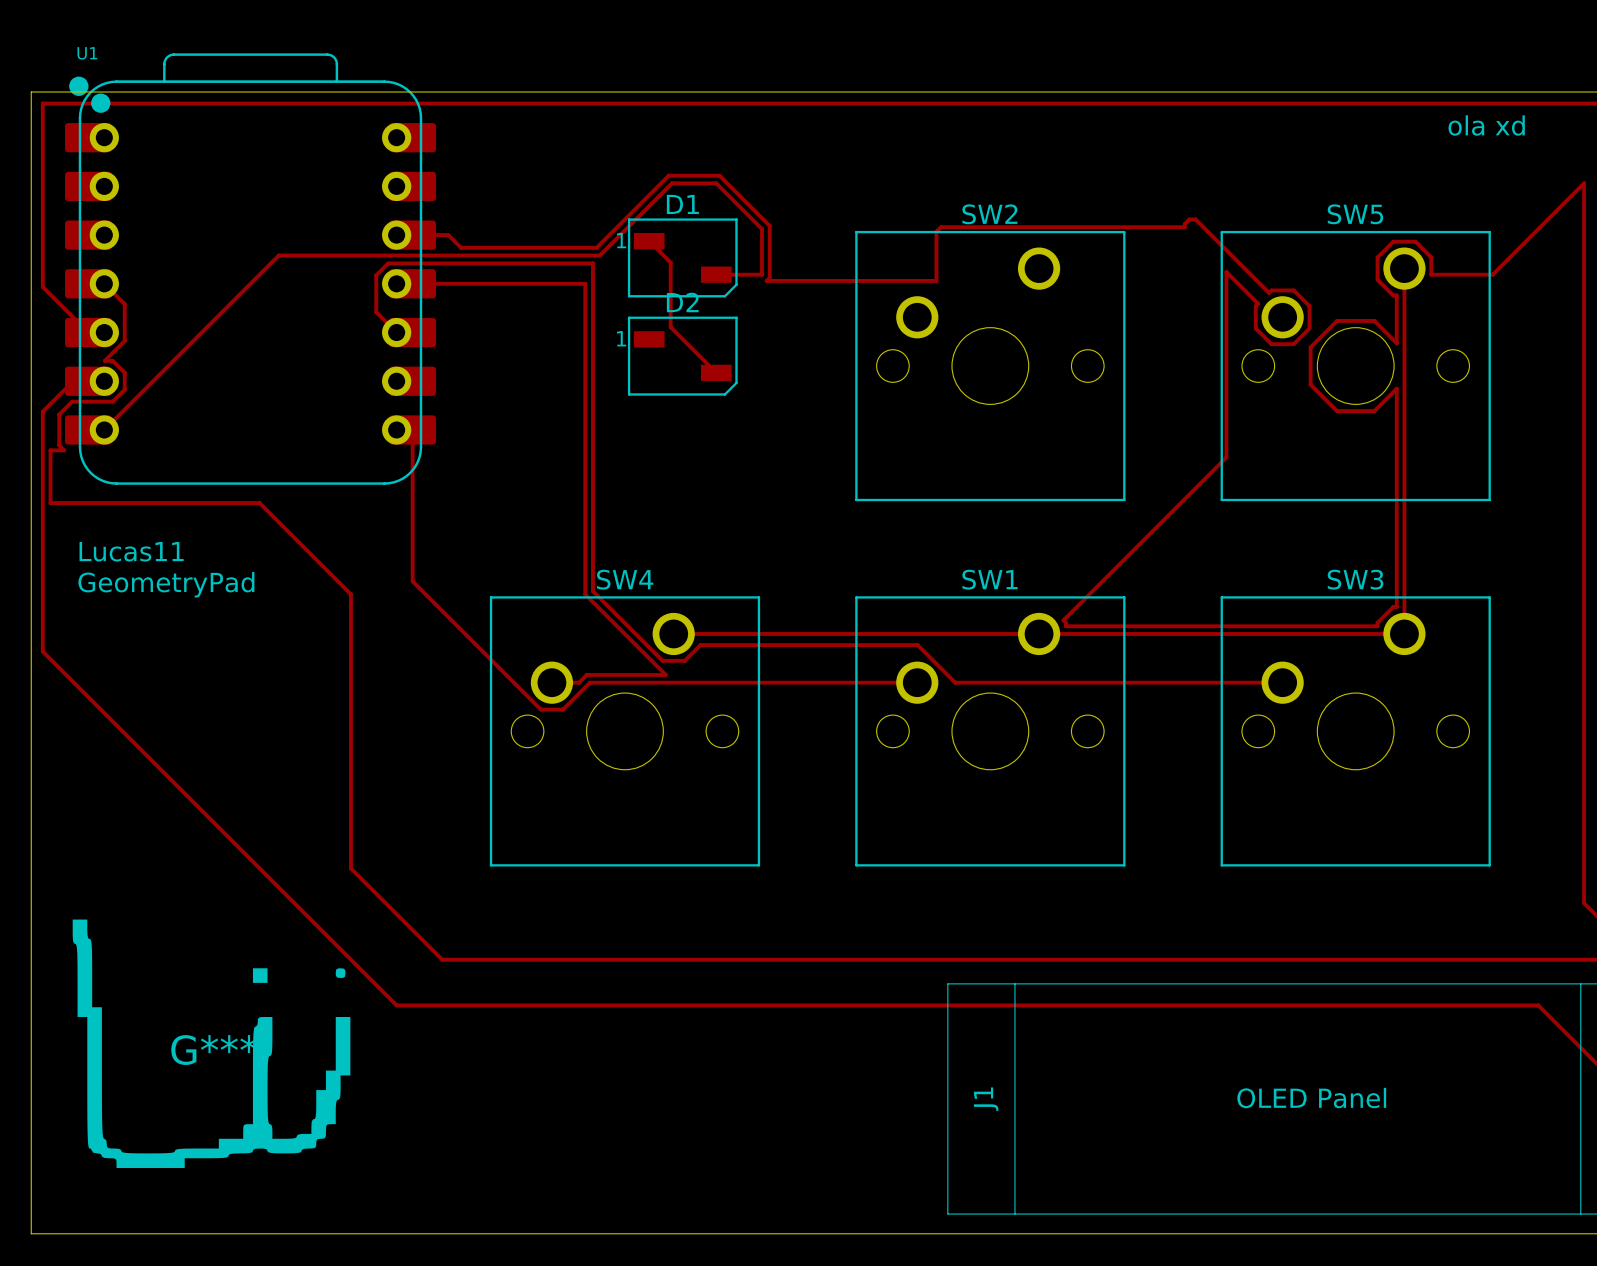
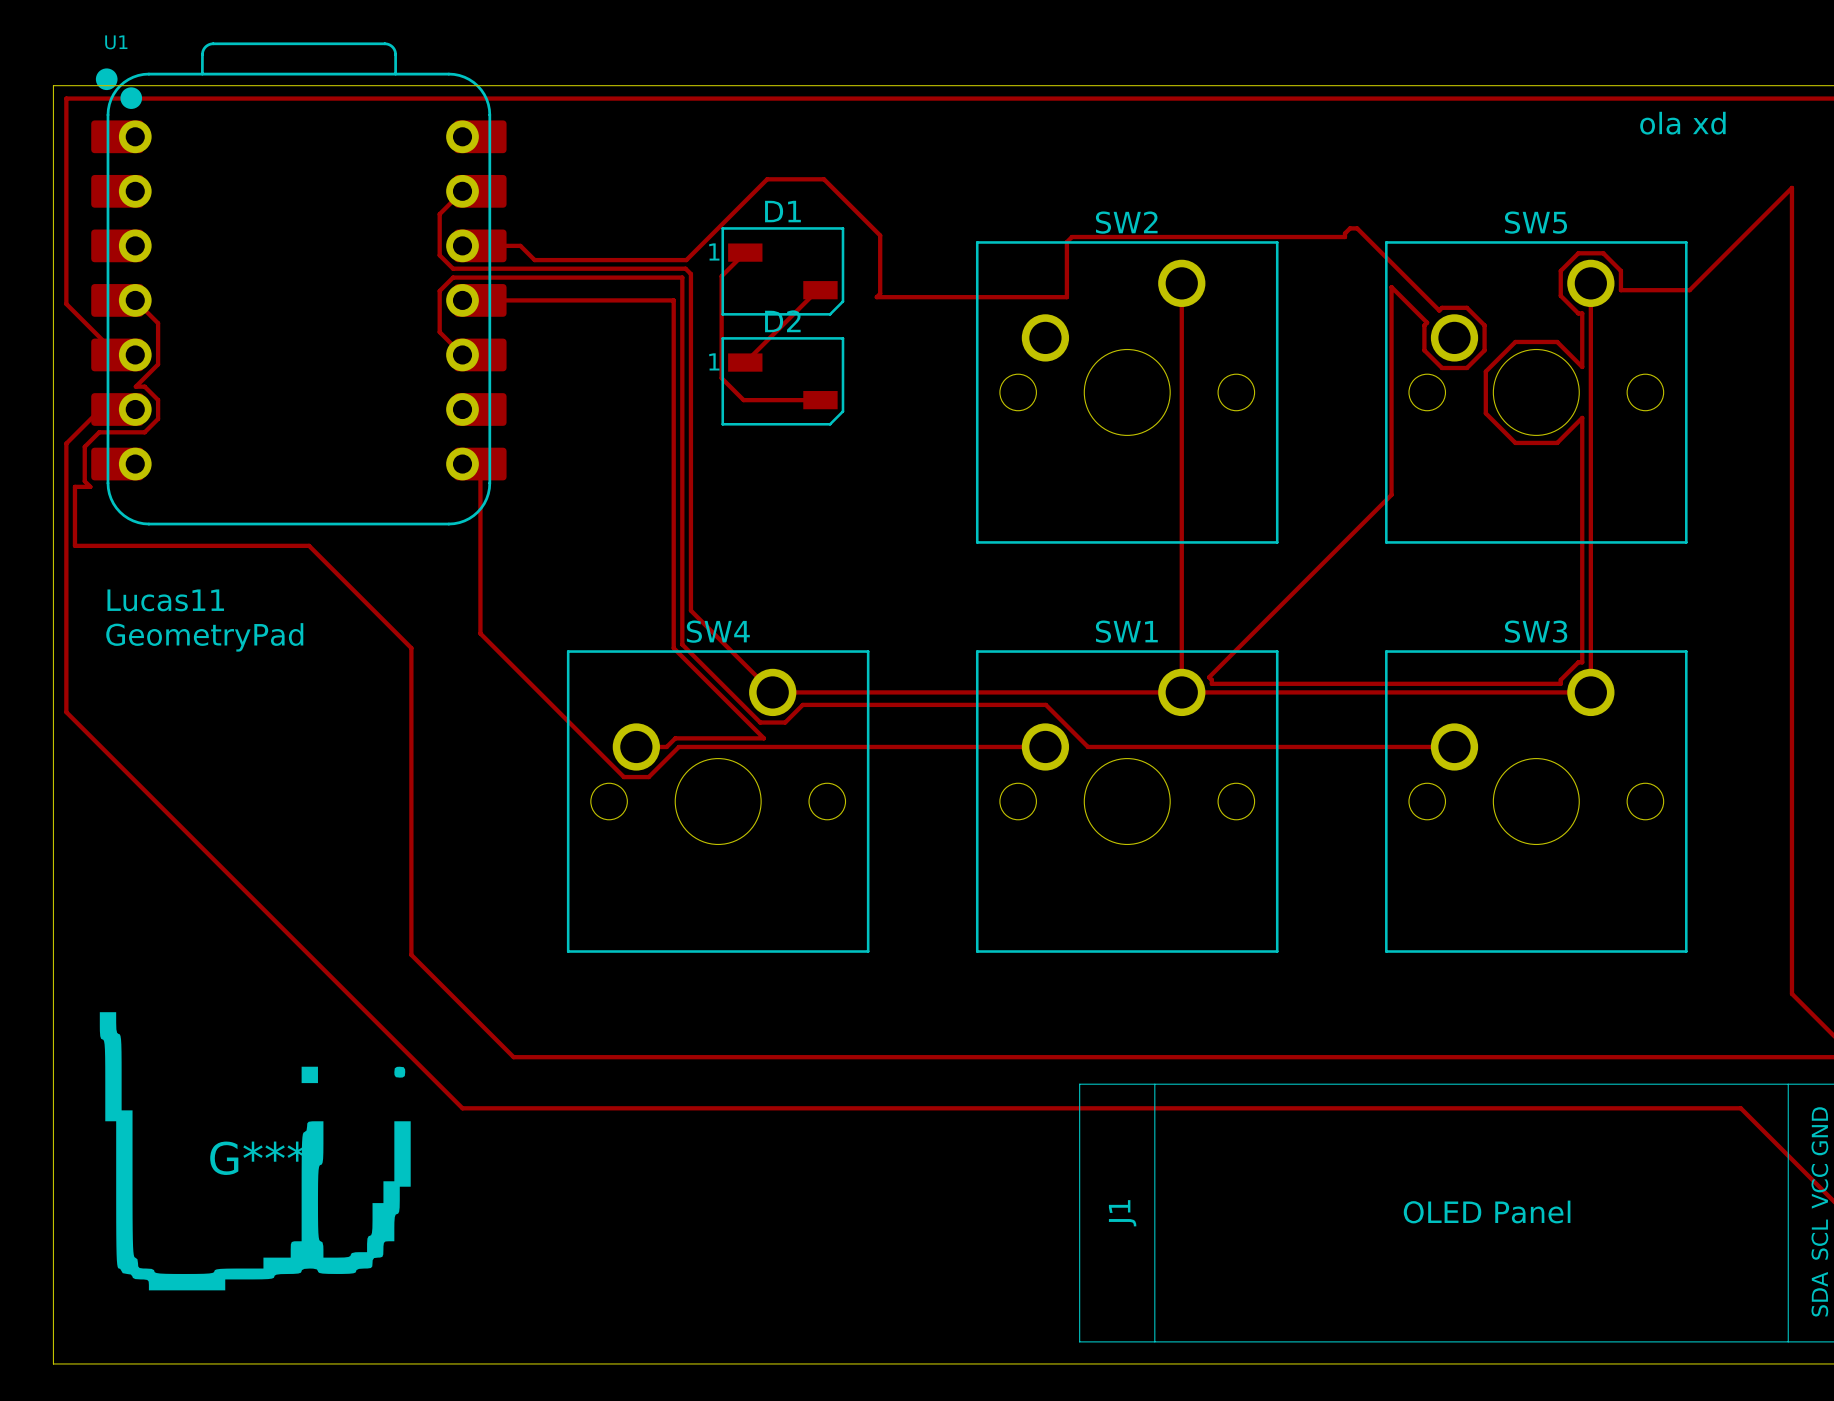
track: (649, 241) (670, 262) (670, 327) (716, 372) -> (745, 252) (721, 276) (721, 378) (743, 400) (820, 400)
track: (388, 255) (278, 255) (104, 429) -> (453, 268) (439, 255) (439, 214) (462, 191)
track: (595, 255) (599, 255) (671, 183) (716, 183) (762, 229) (762, 274) (716, 274) -> (745, 362) (817, 290) (820, 290)
track: none -> (685, 268) (690, 274) (690, 610) (772, 692)
track: none -> (1181, 283) (1181, 692)

